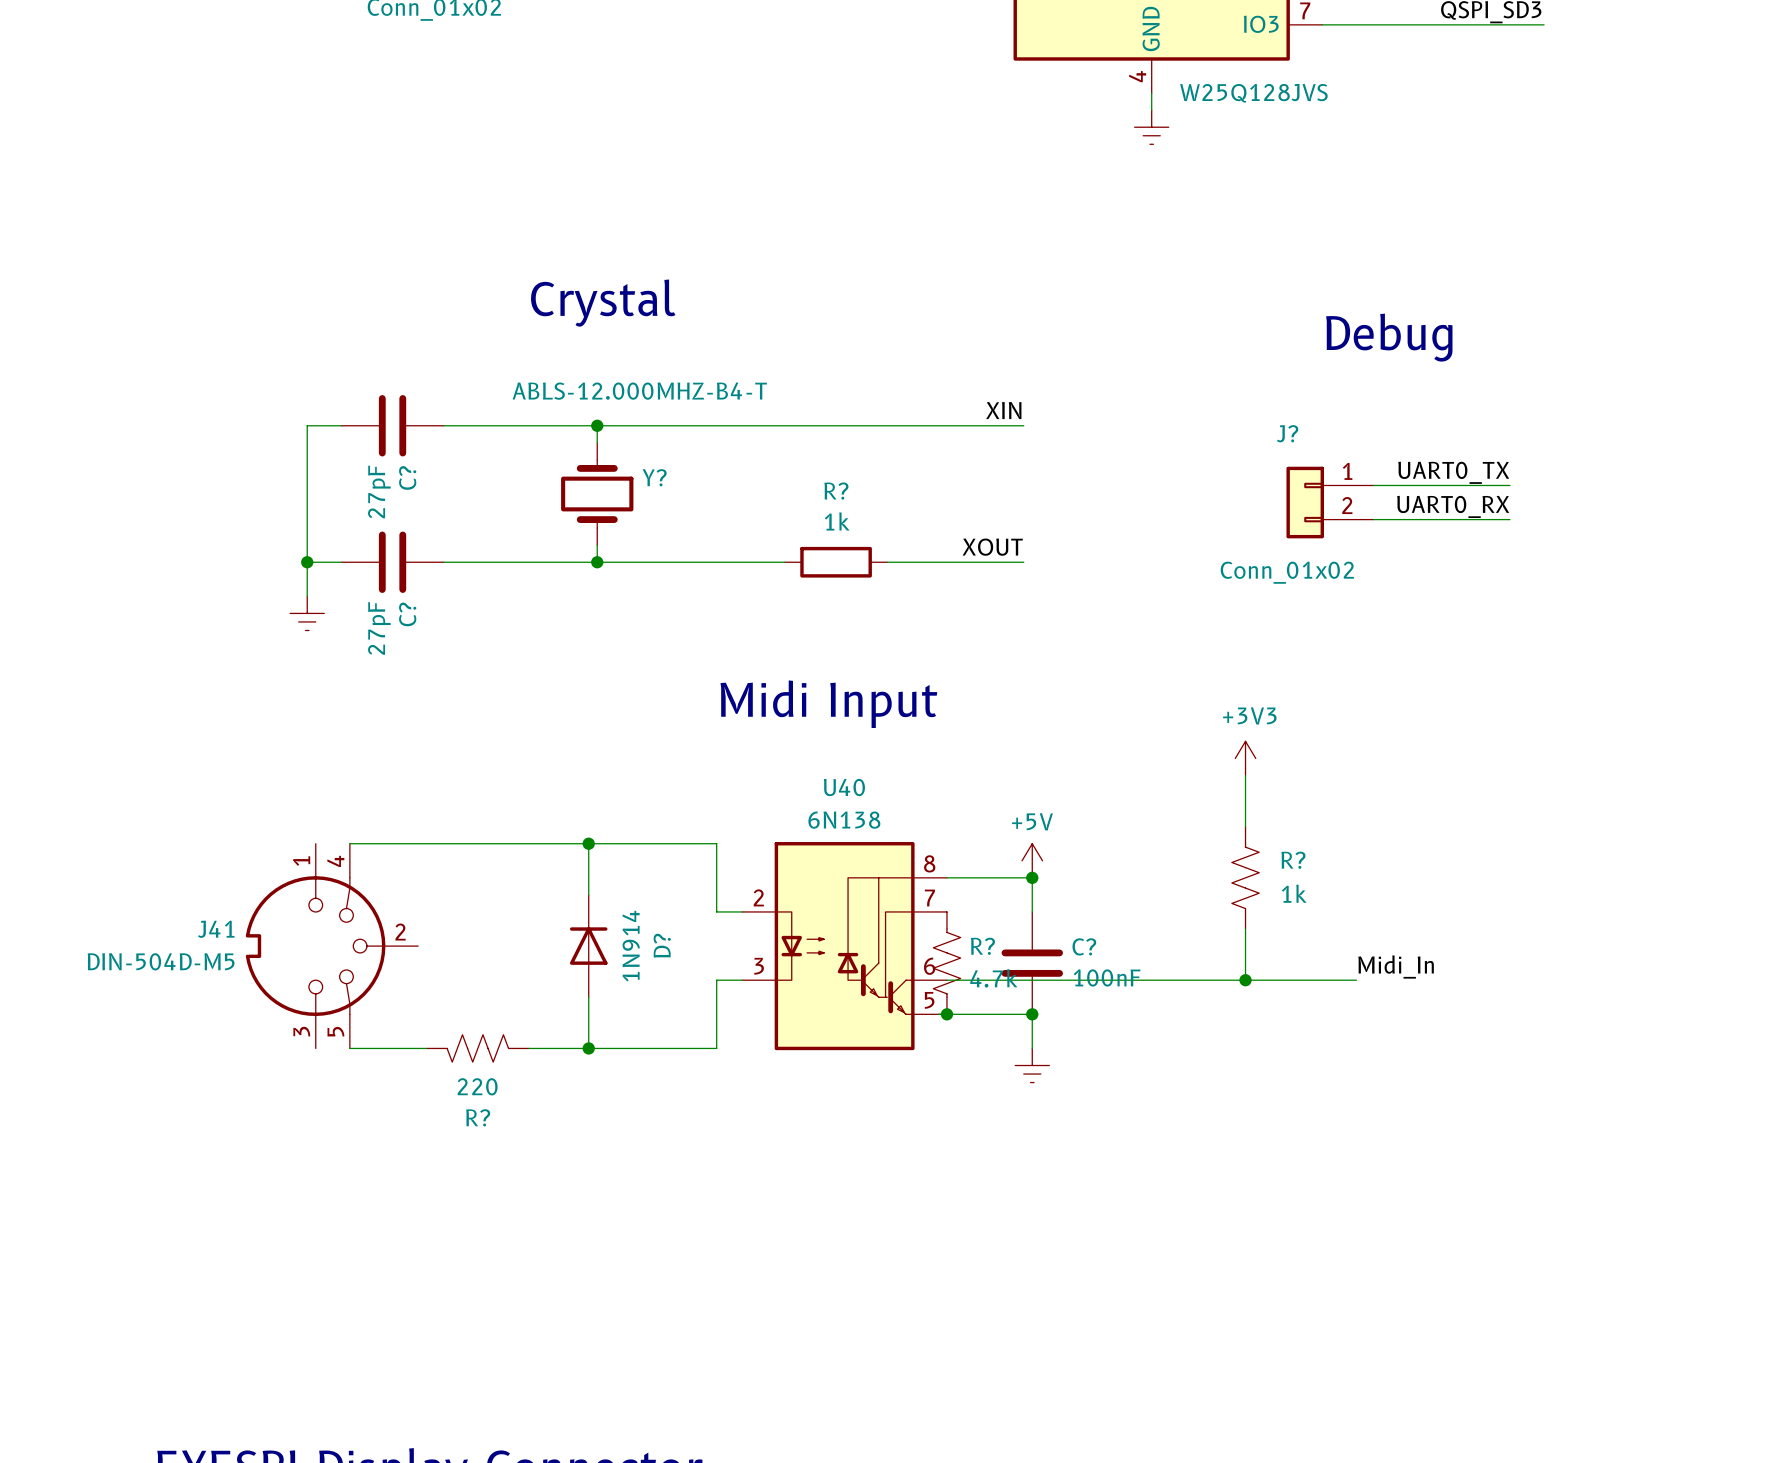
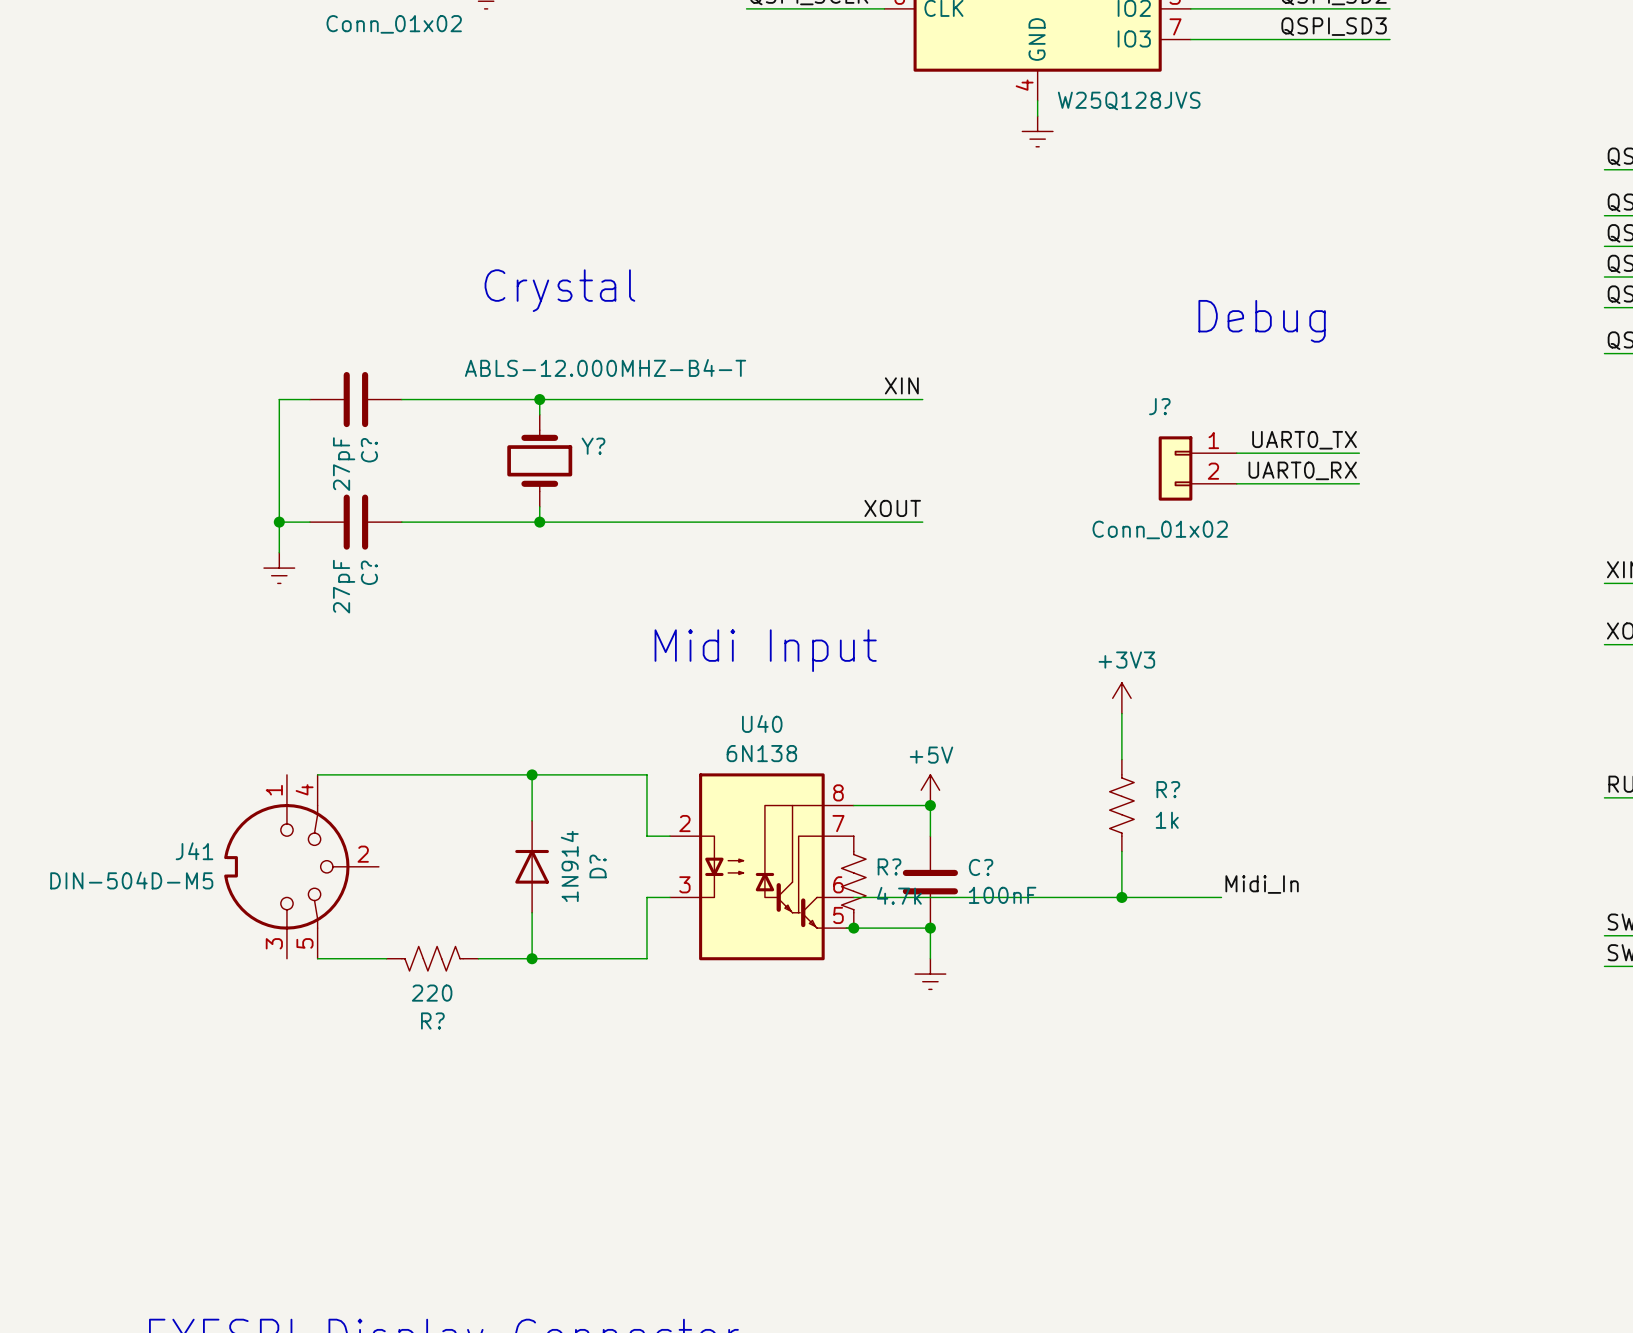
wire: none -> (708, 522) (800, 522)
R?: 1k (836, 562) -> none

